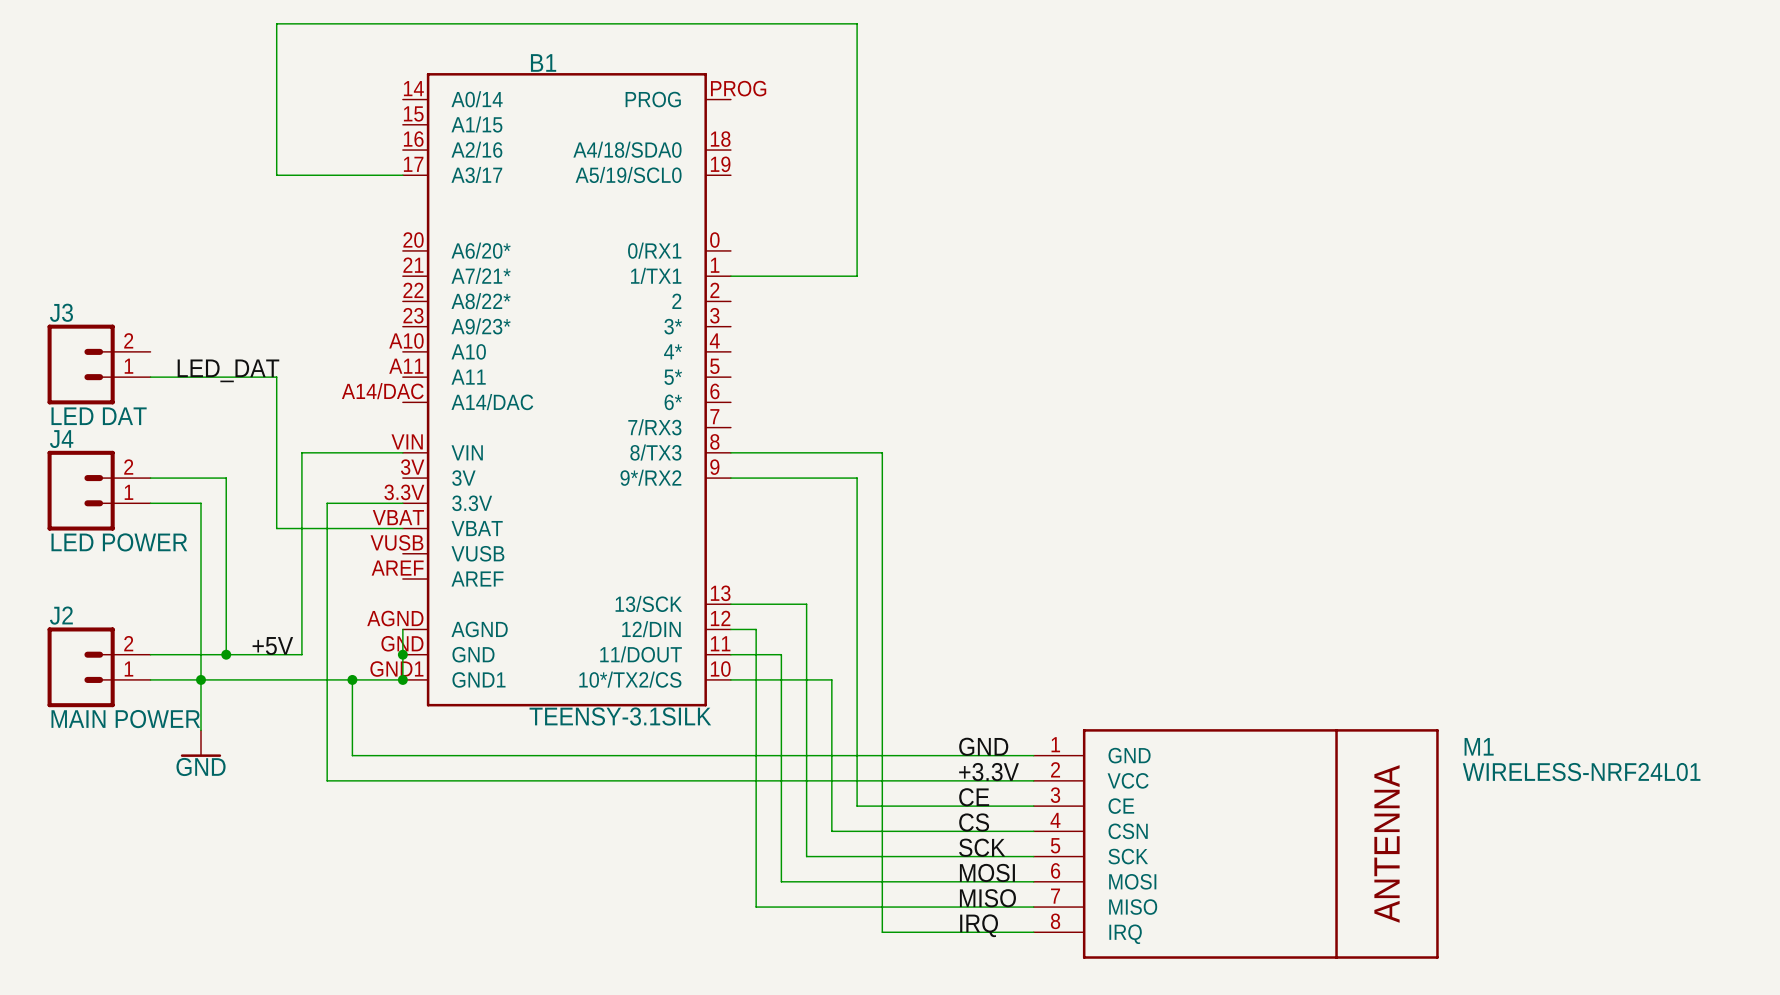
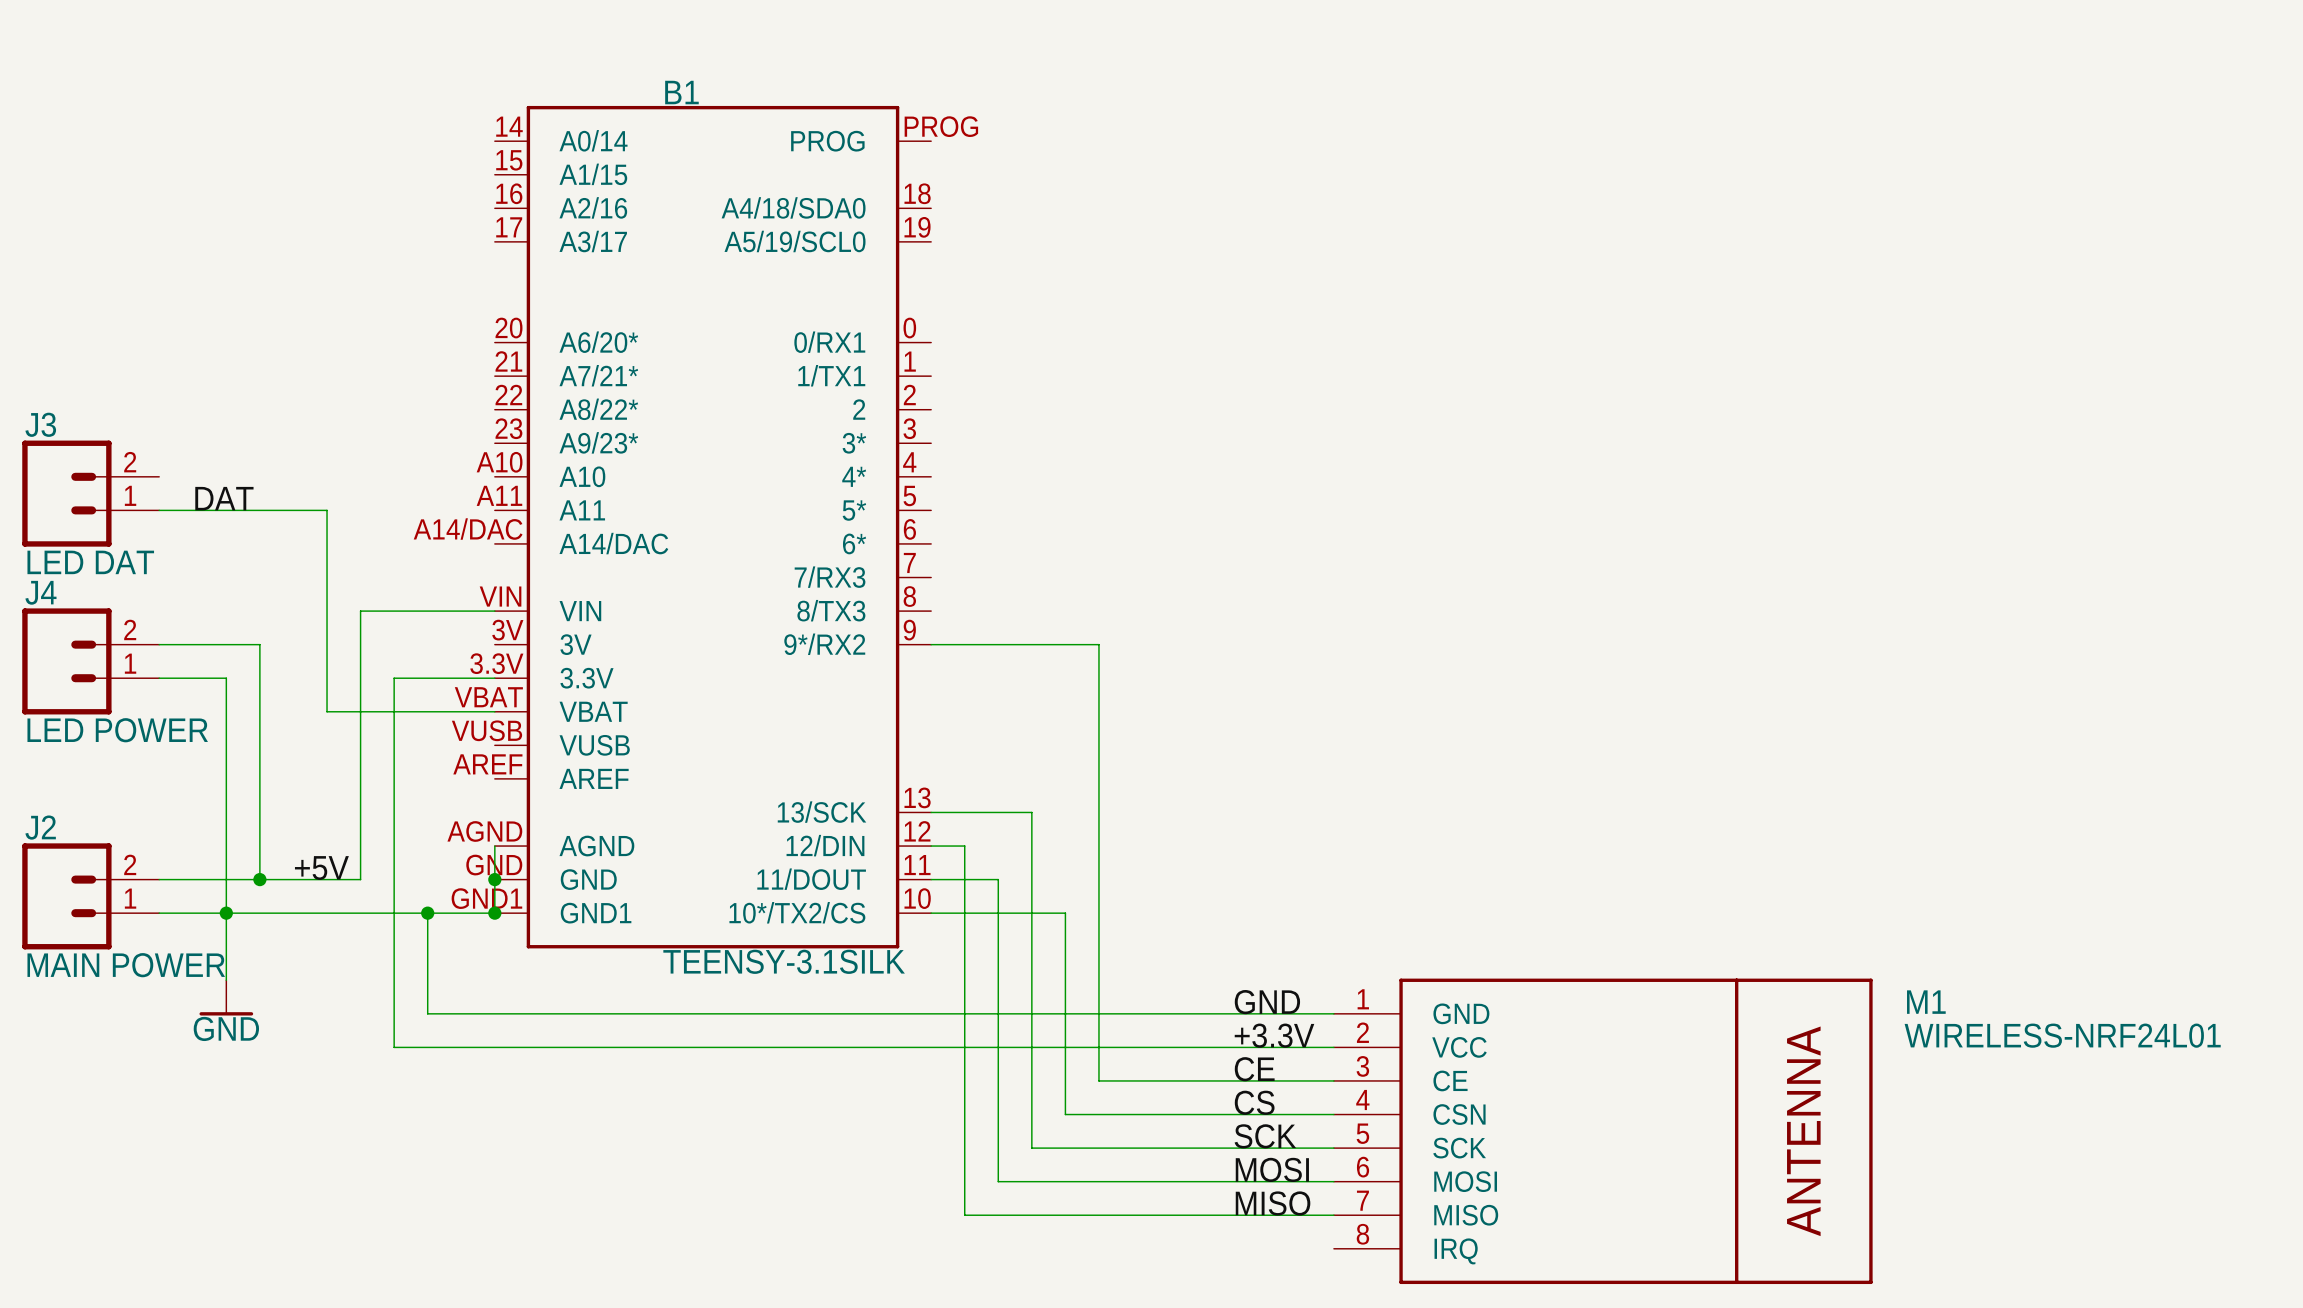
wire: (402, 175) (276, 175) (276, 23) (857, 23) (857, 276) (730, 276) -> none
label: LED_DAT (228, 370) -> DAT (224, 498)
wire: (730, 452) (882, 452) (882, 932) (1033, 932) -> none
label: IRQ (979, 925) -> none

